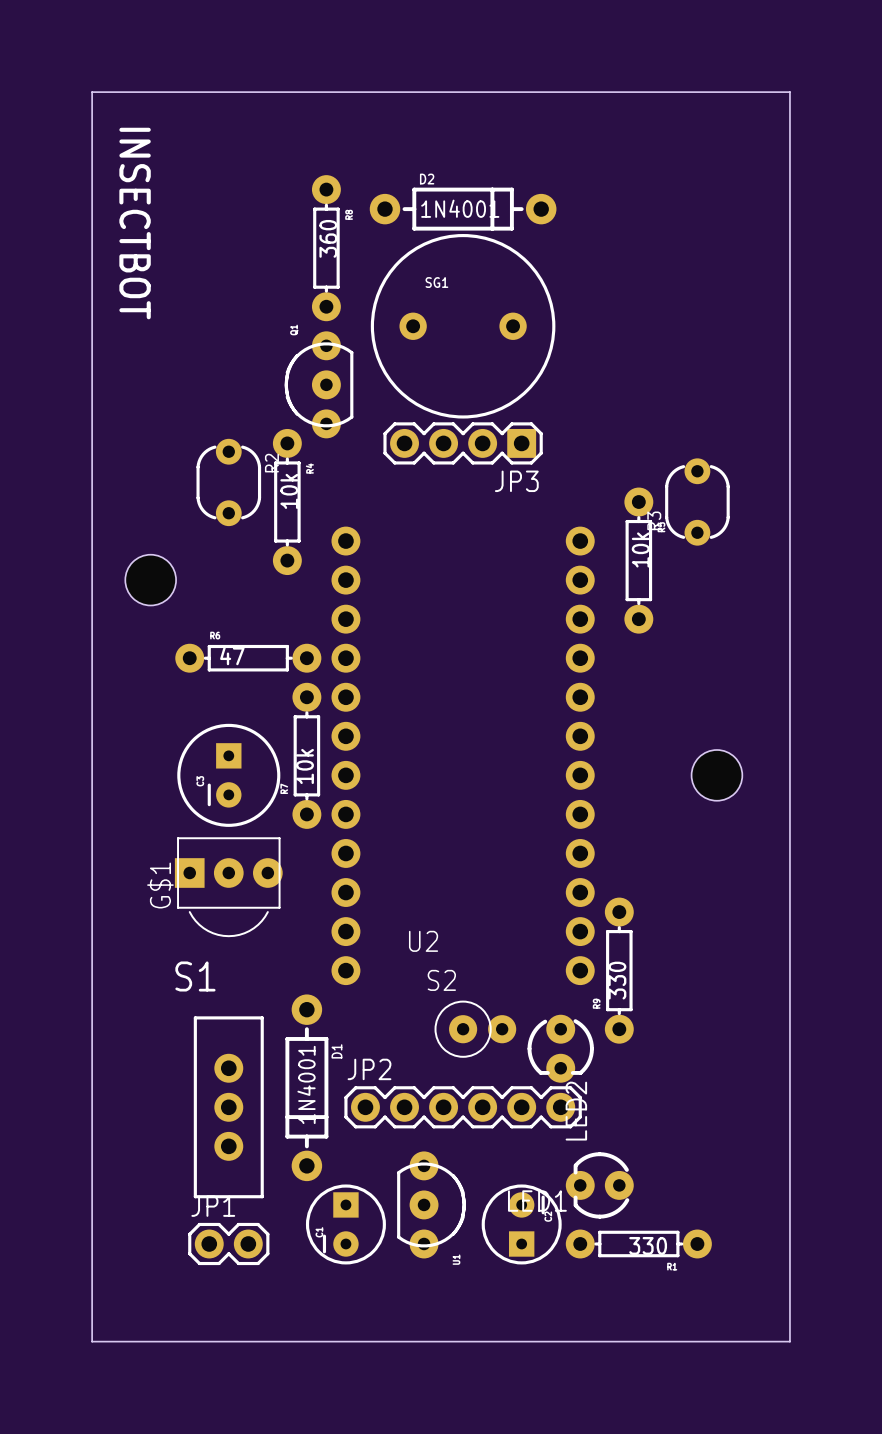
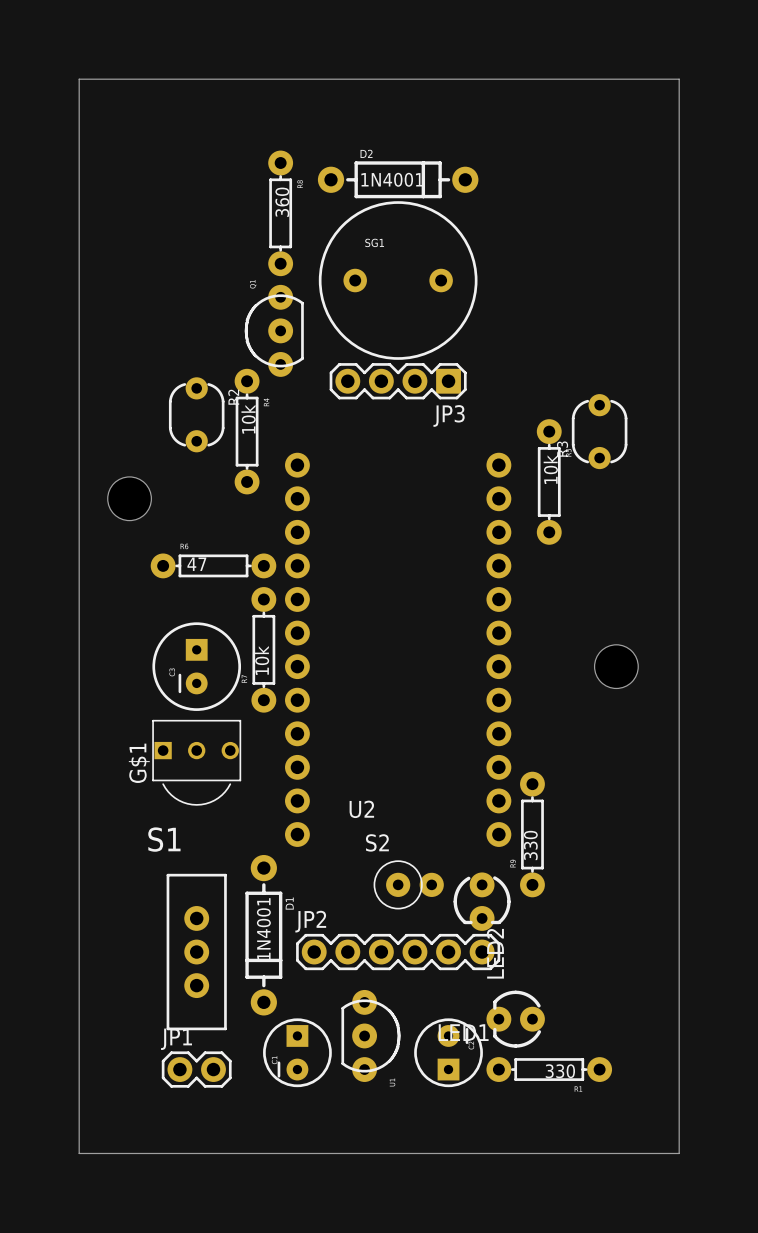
text: INSECTBOT (135, 223) -> none
part footprint: [174, 837, 283, 938] -> [152, 719, 242, 806]

